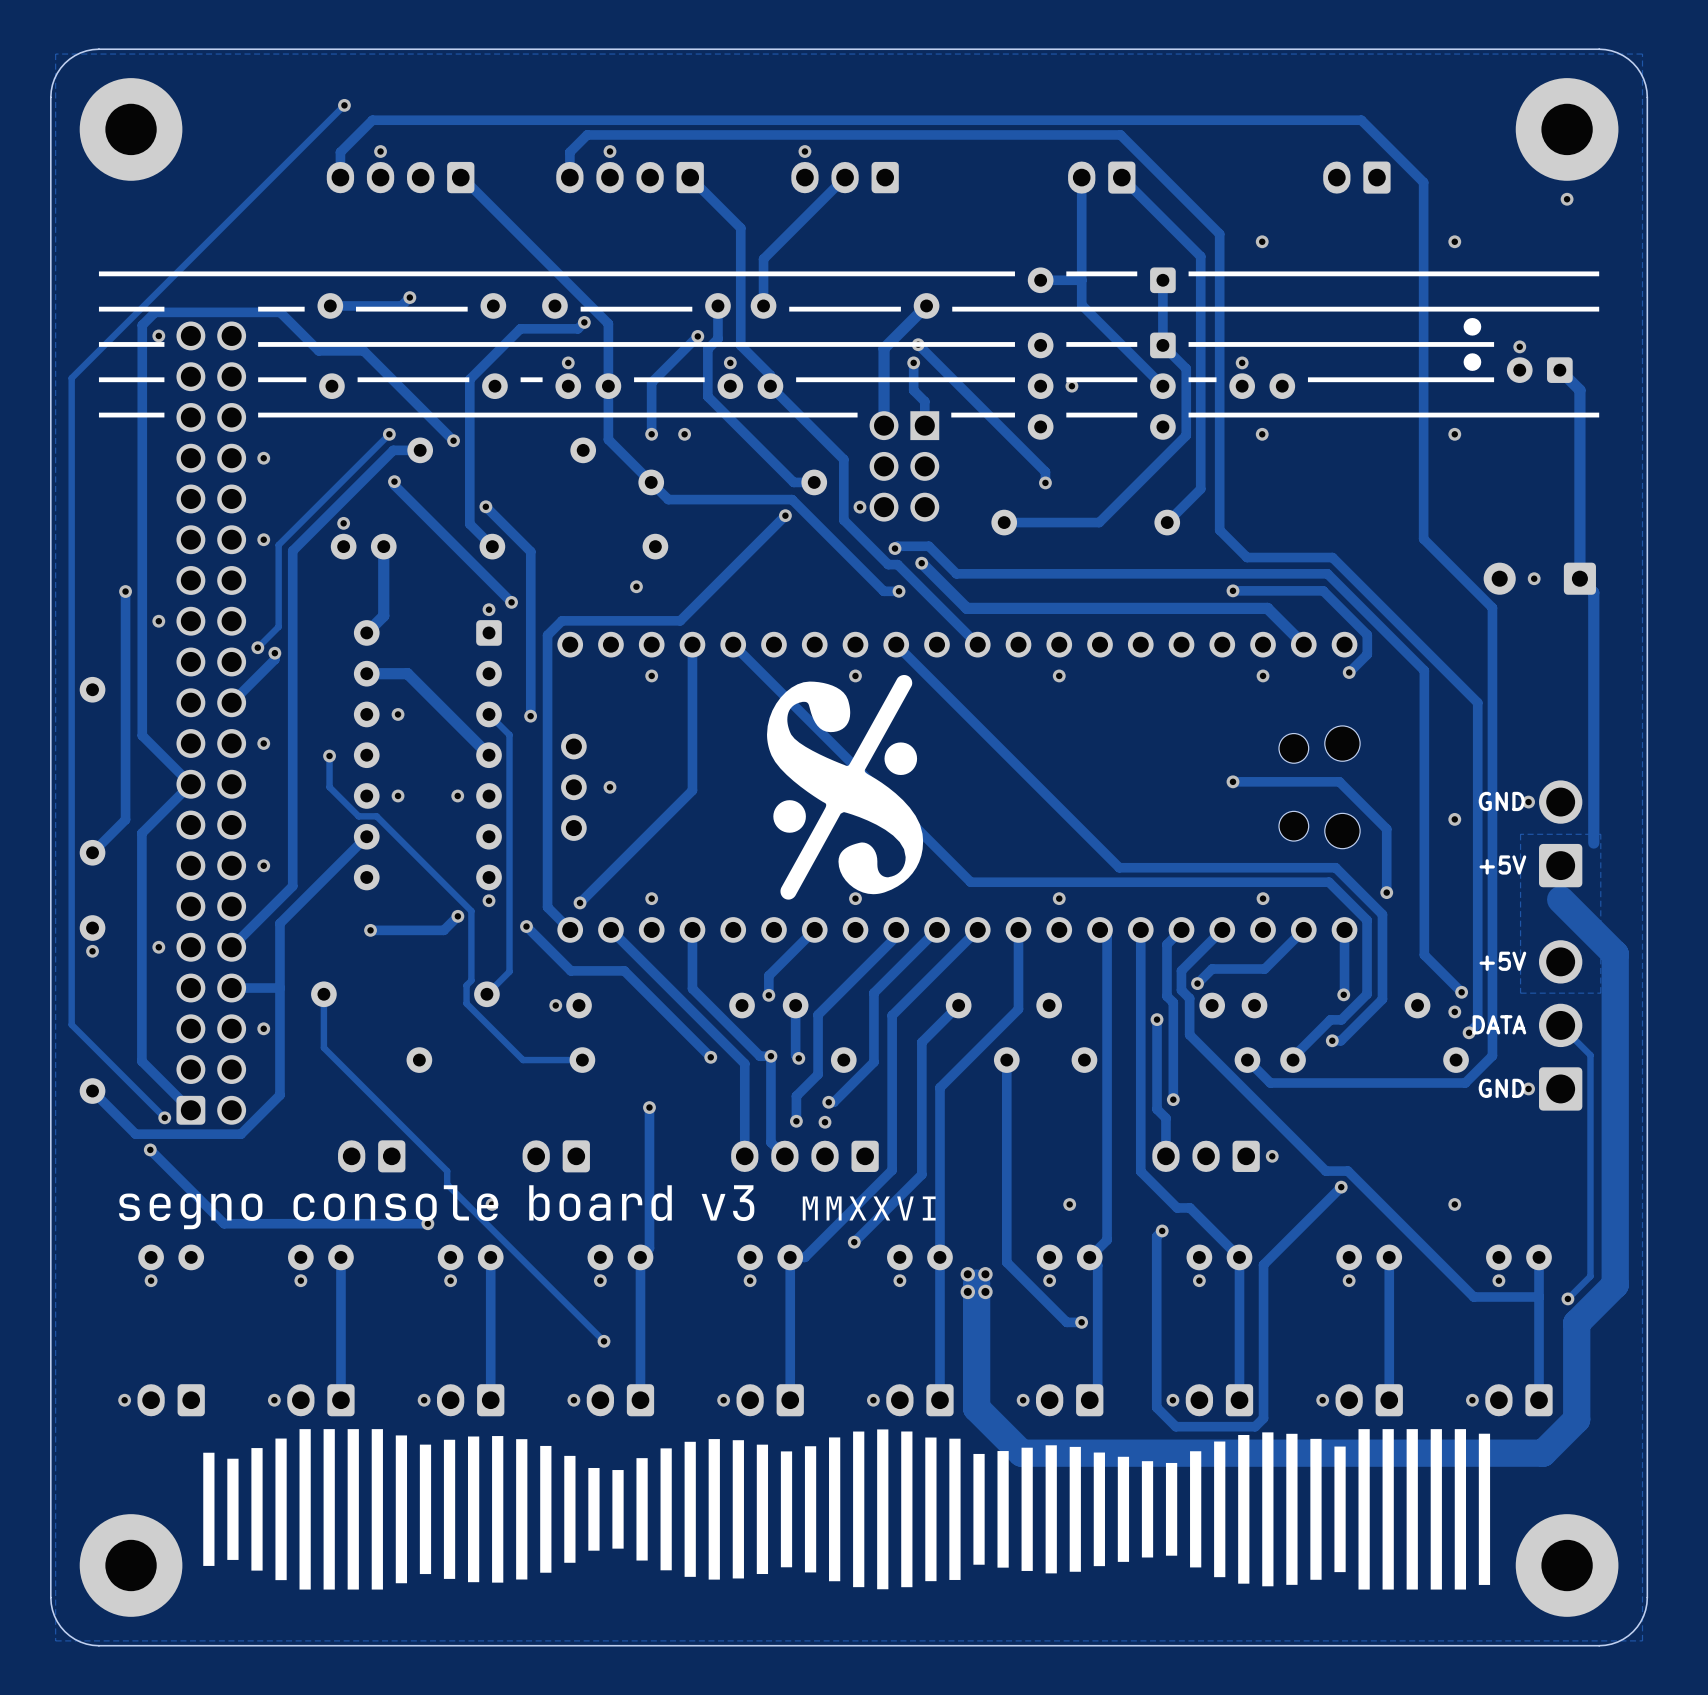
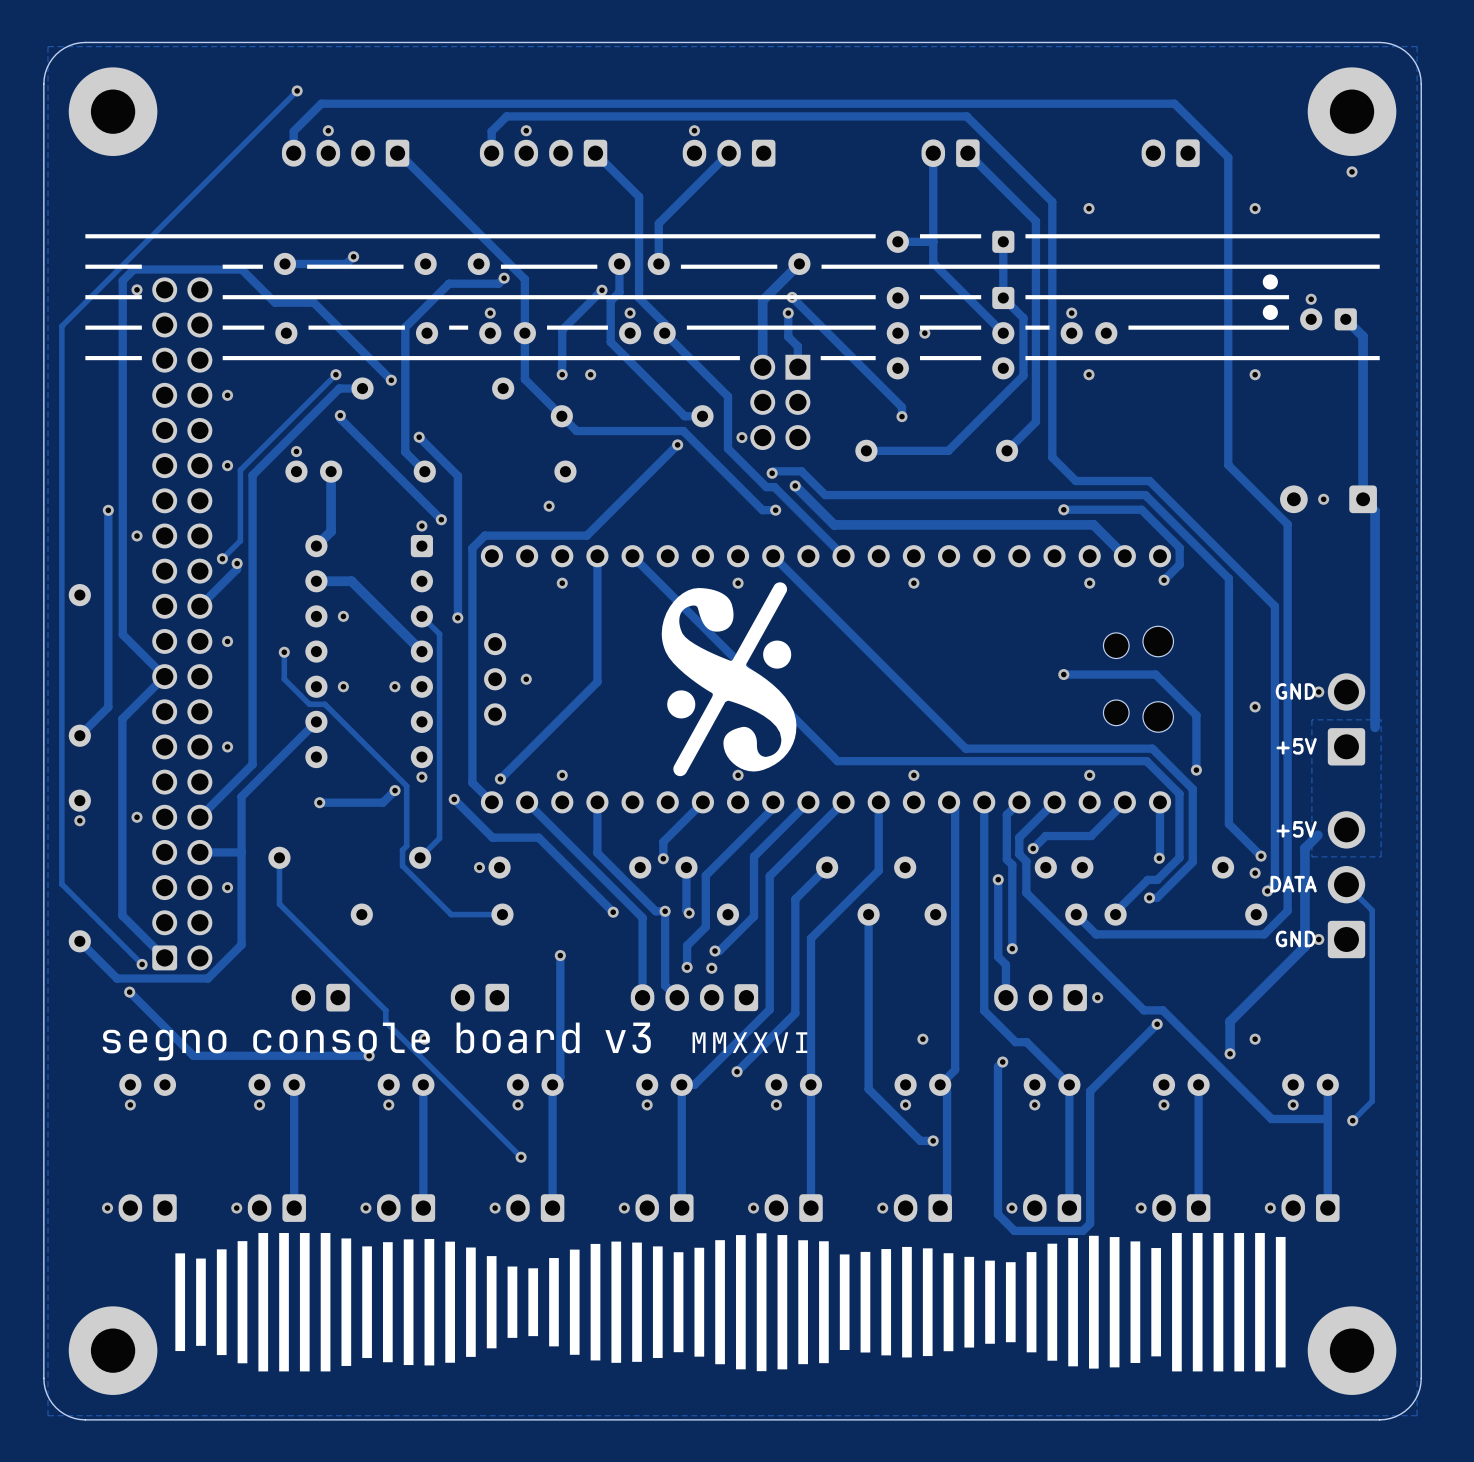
track: (1560, 899) (1615, 954) (1615, 1284) (1576, 1323) (1576, 1419) (1543, 1453) (1021, 1453) (976, 1408) (976, 1283) -> none
track: none -> (1317, 835) (1304, 848) (1304, 946) (1230, 1021) (1230, 1053)
via: none -> (1230, 1053)
via: (967, 1274) -> none
via: (985, 1274) -> none
via: (967, 1291) -> none
via: (985, 1291) -> none

